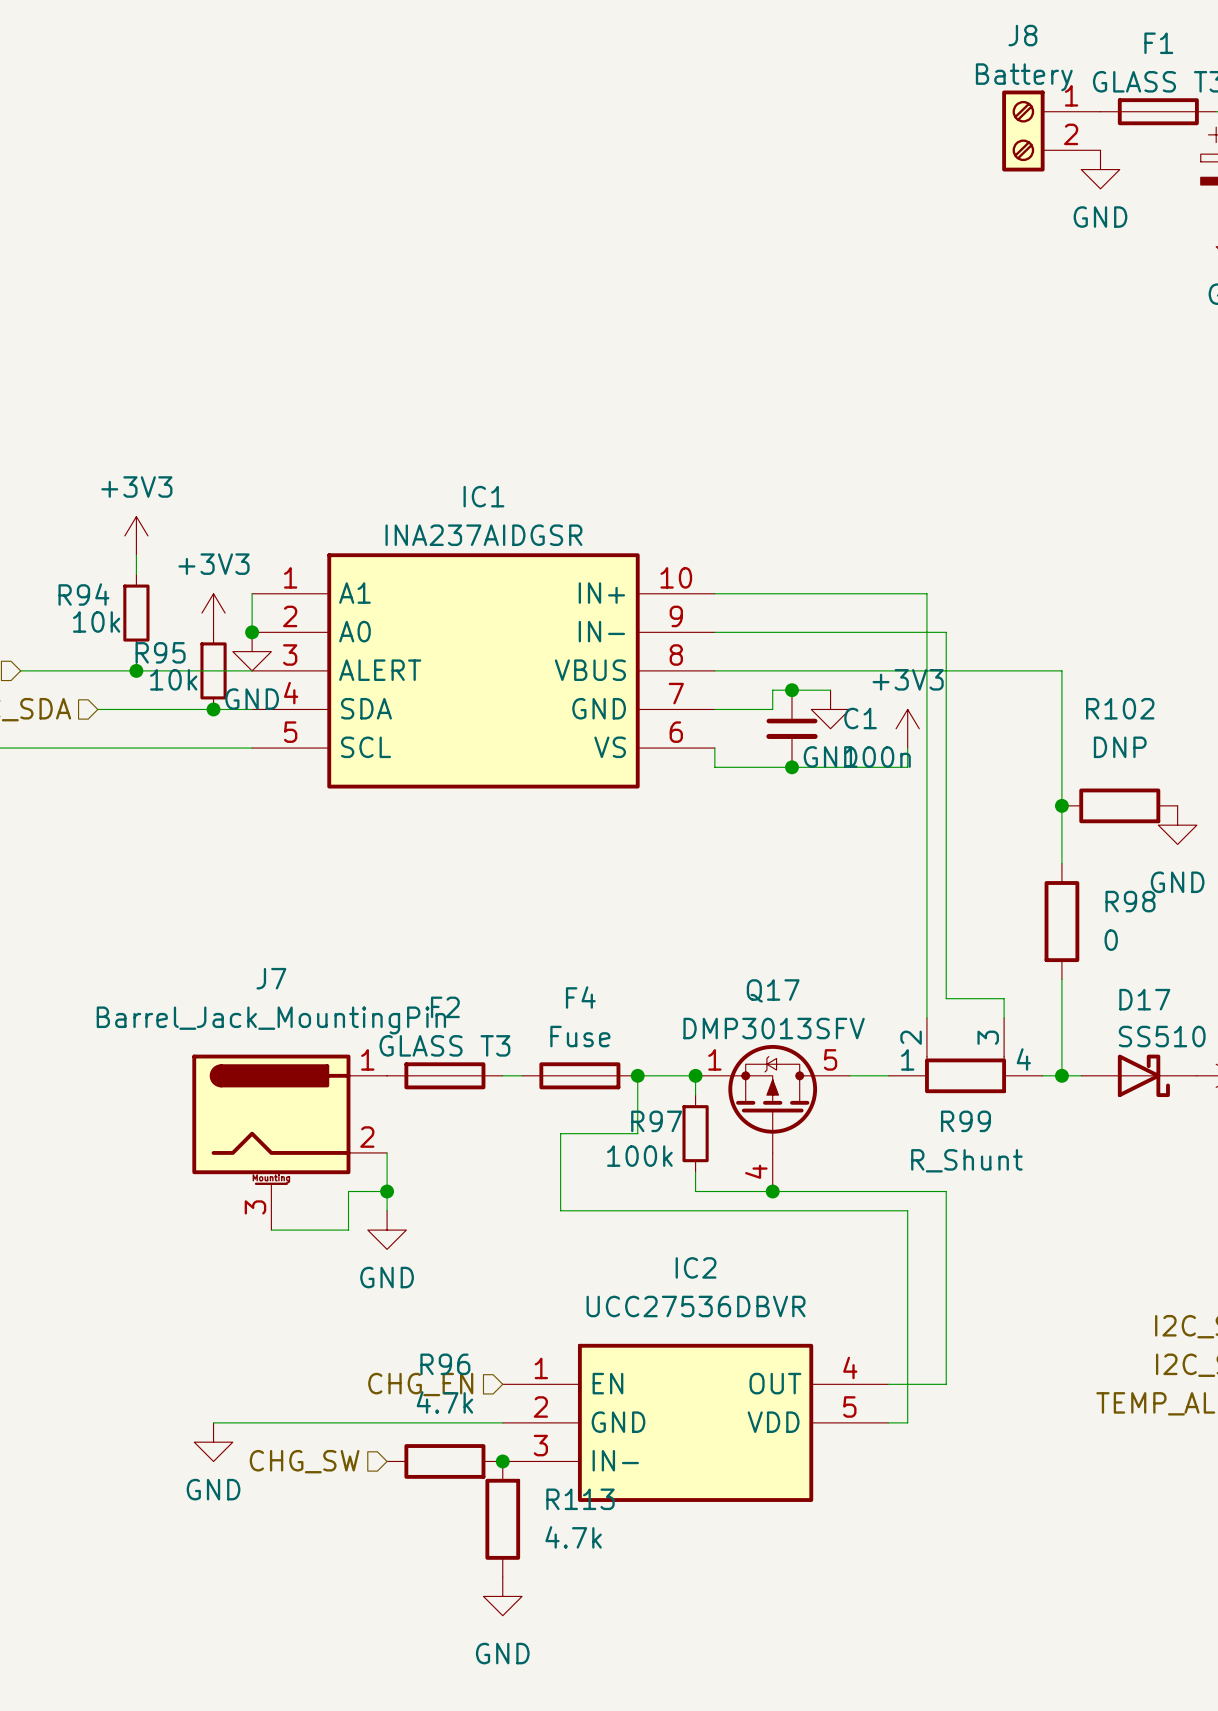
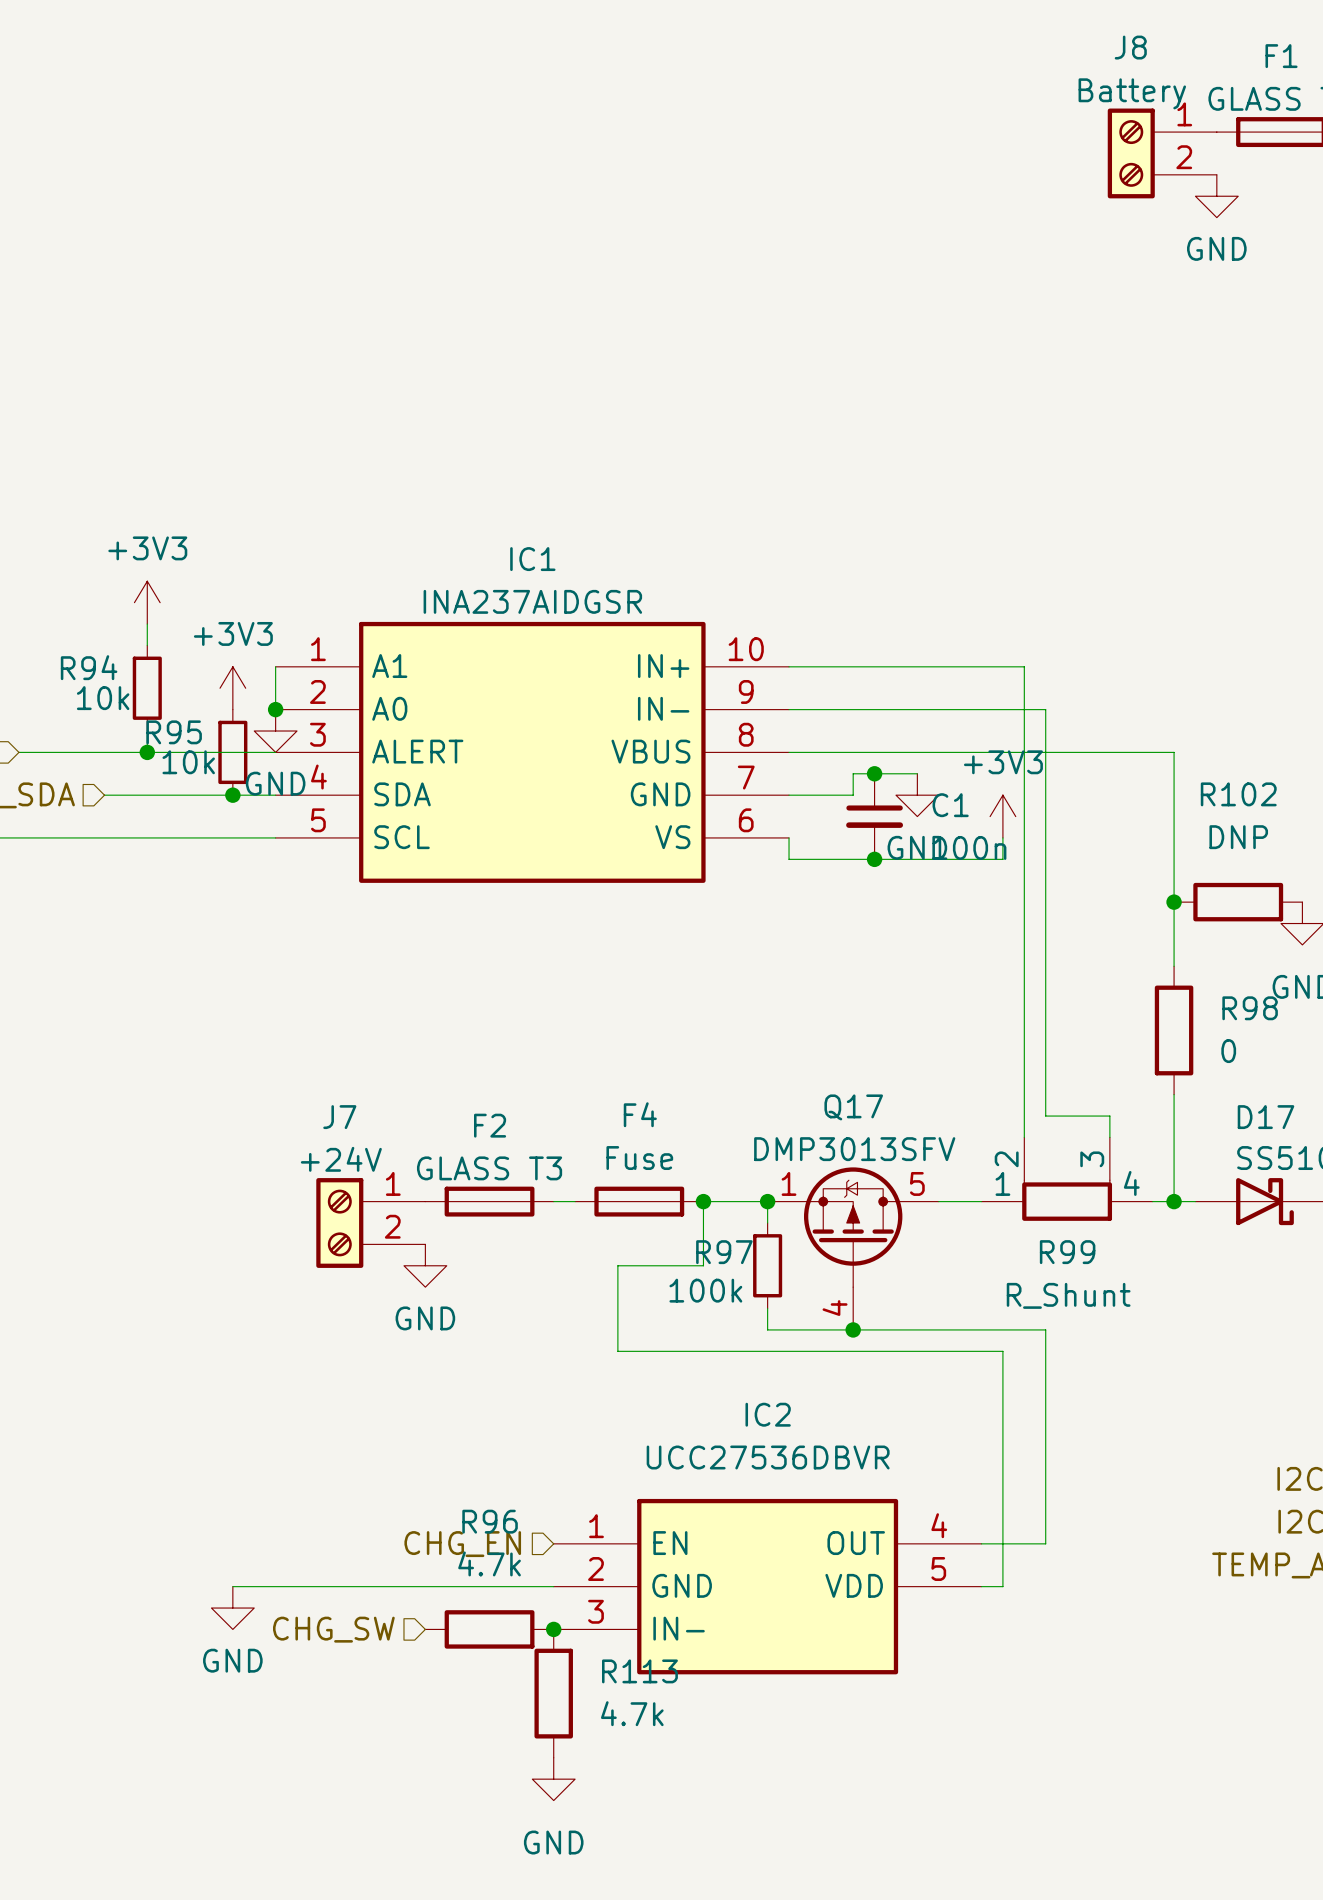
J7 name position: J7 (271, 978) -> J7 (339, 1117)
J7 value: Barrel_Jack_MountingPin (271, 1020) -> +24V (341, 1159)
J7 symbol: [192, 1054, 388, 1231] -> [316, 1178, 426, 1268]
wire: (387, 1152) (387, 1210) -> none
wire: (387, 1191) (348, 1191) (348, 1230) (271, 1230) -> none
junction: (387, 1191) -> none
power symbol position: GND (387, 1230) -> GND (425, 1265)

